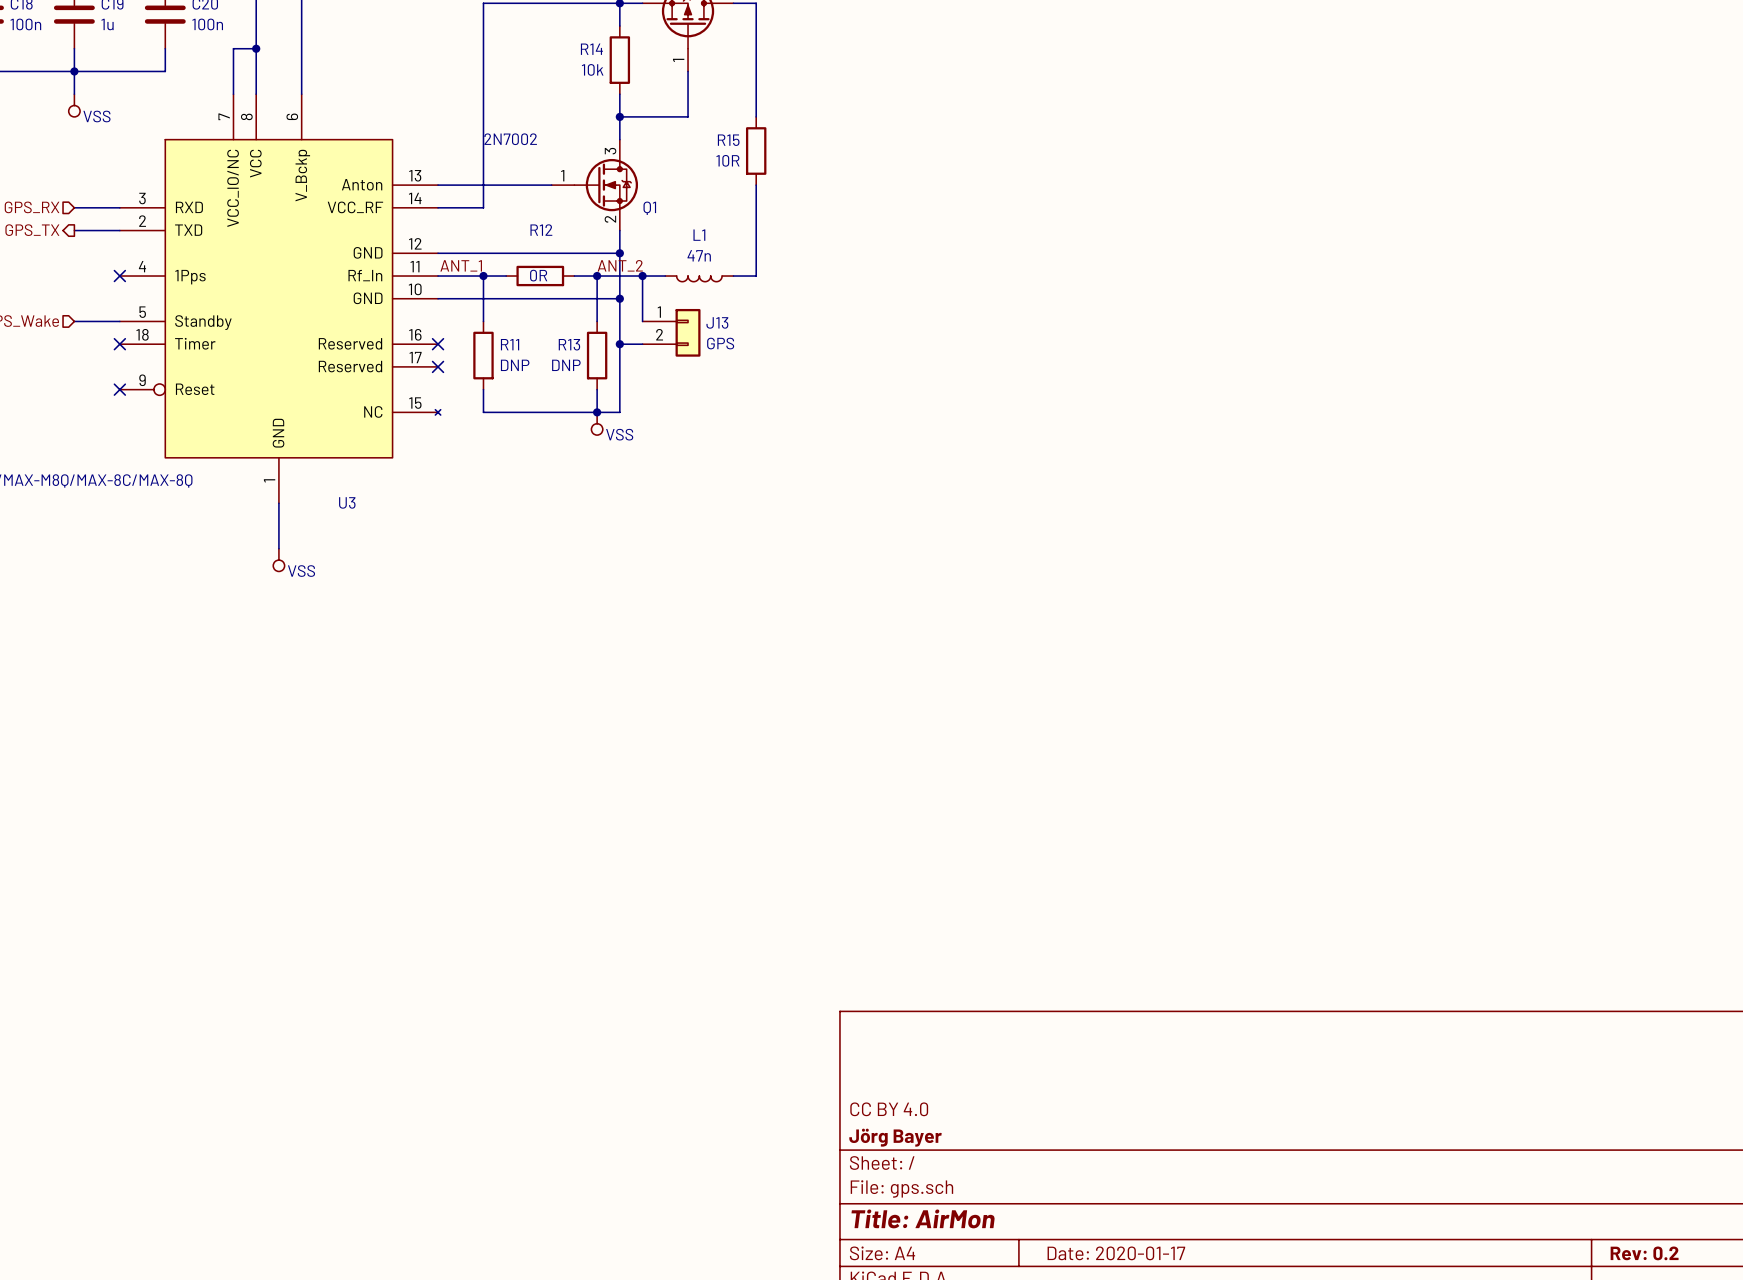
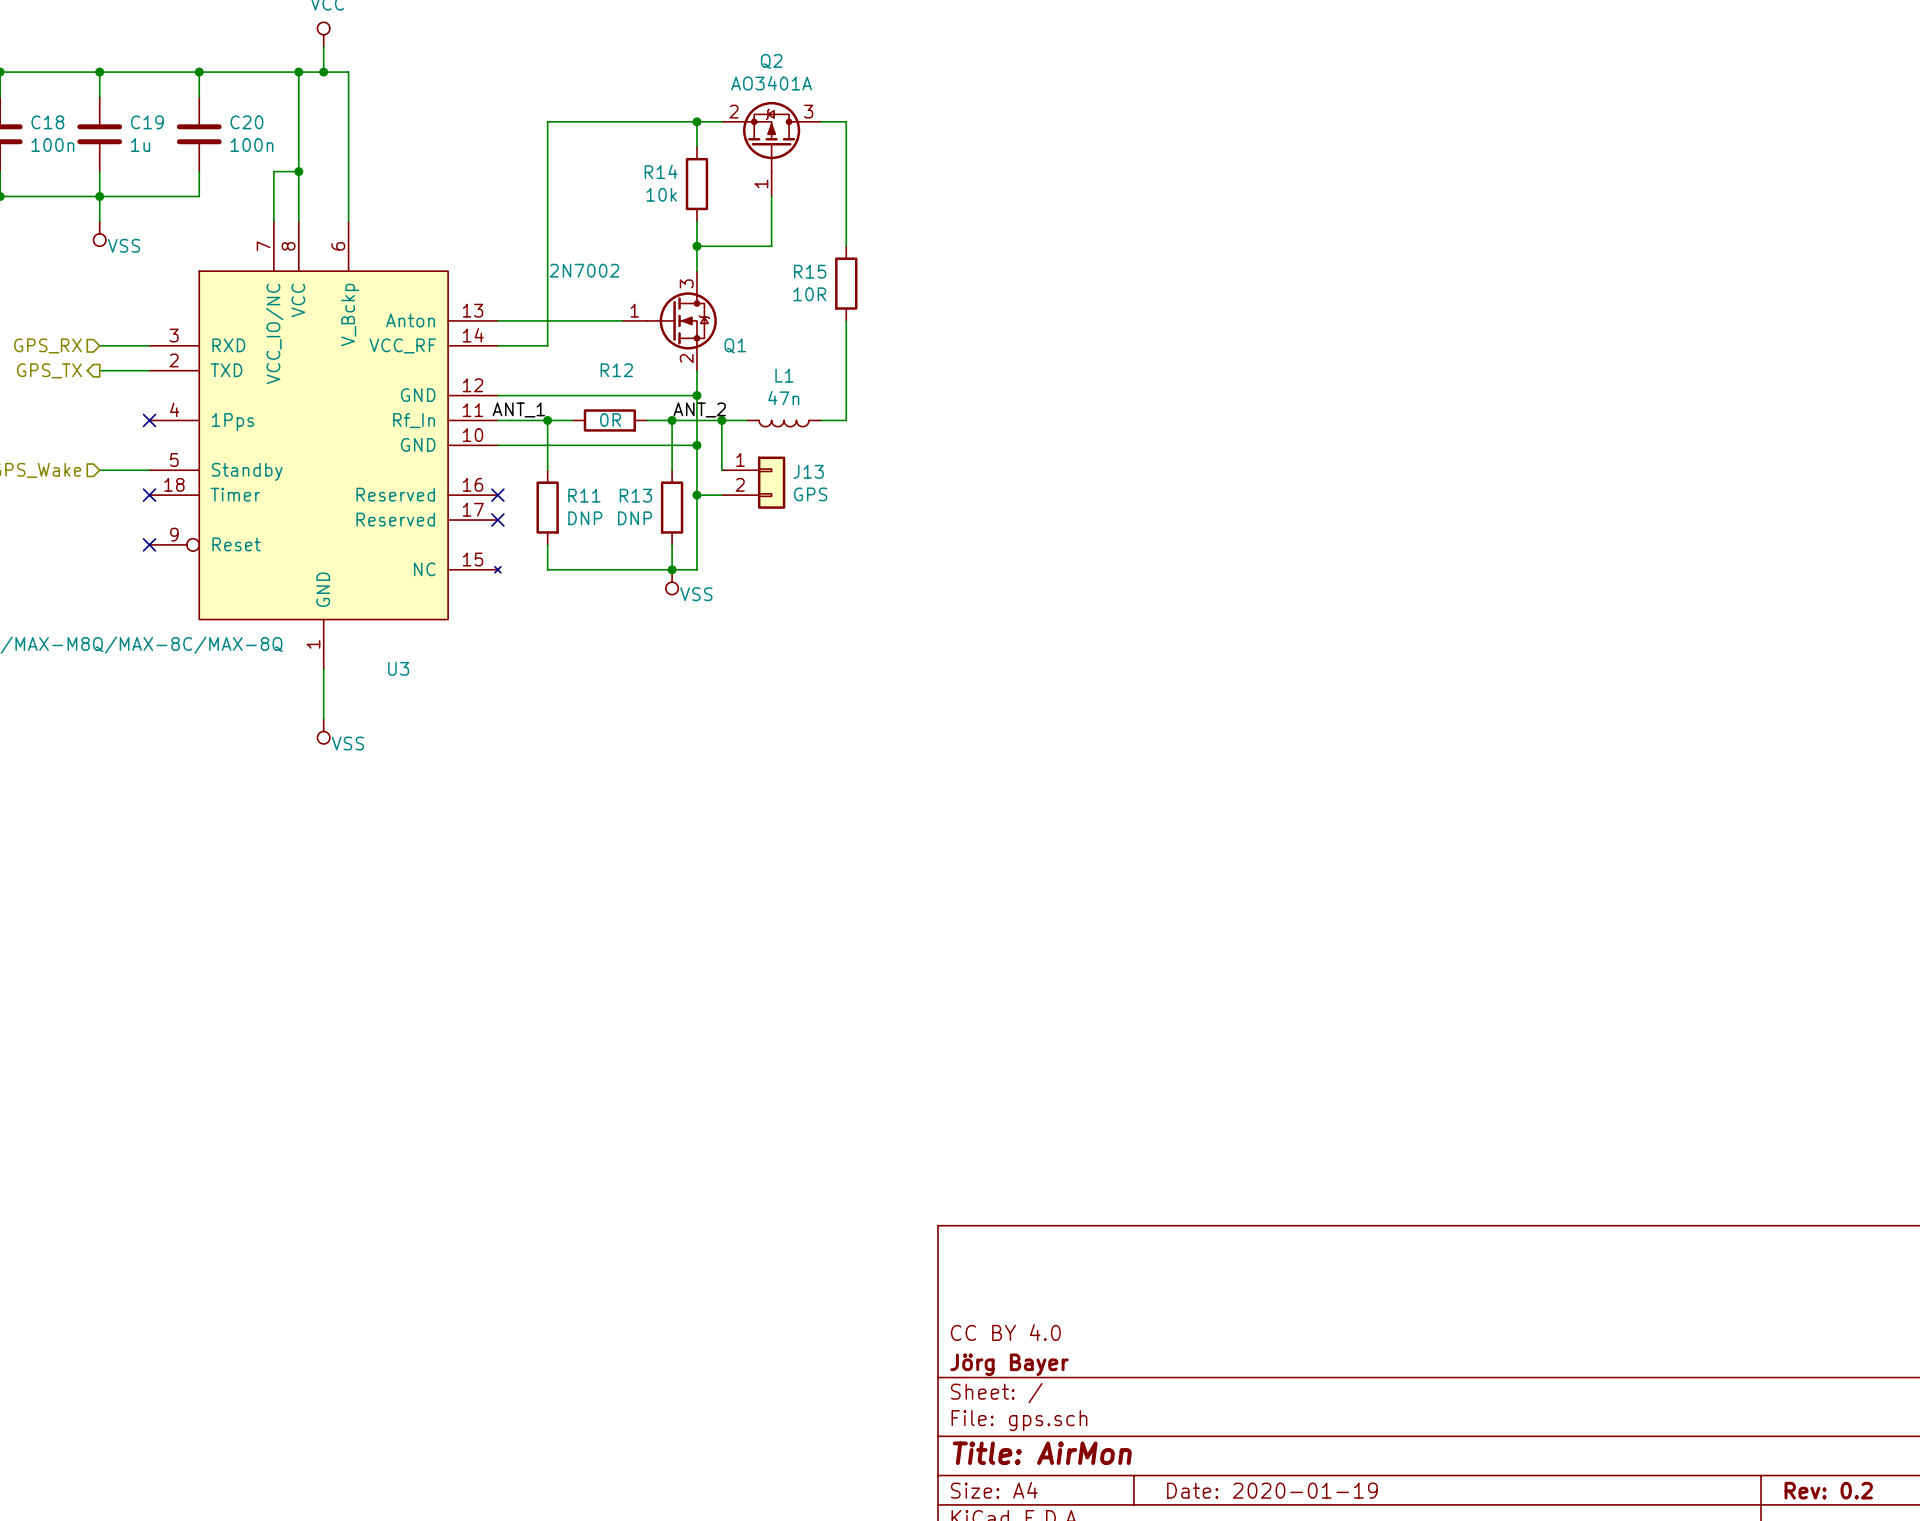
title block: Date: 2020-01-17 (1116, 1253) -> Date: 2020-01-19 (1272, 1490)

